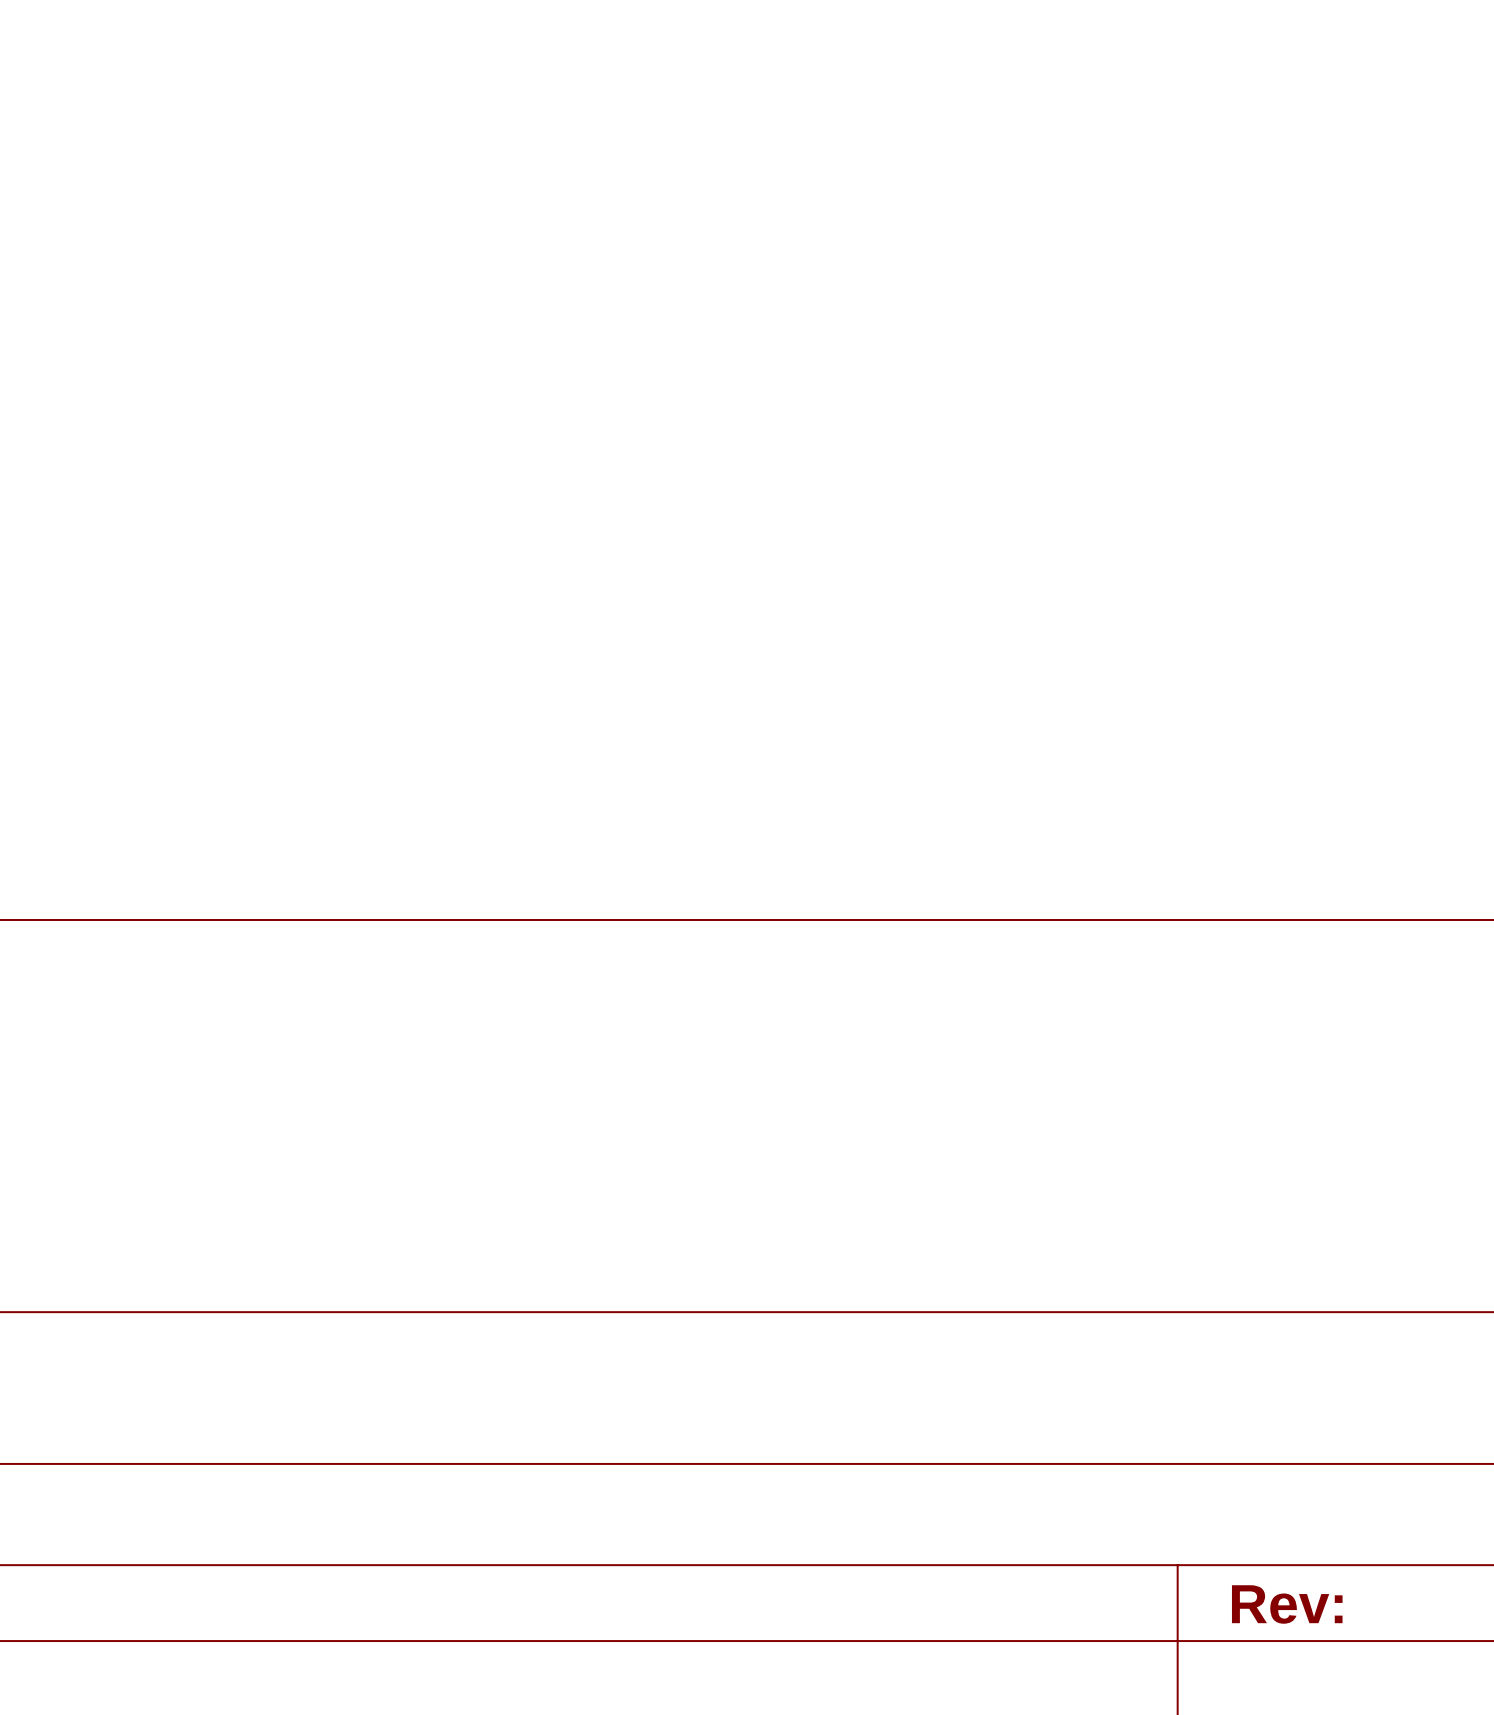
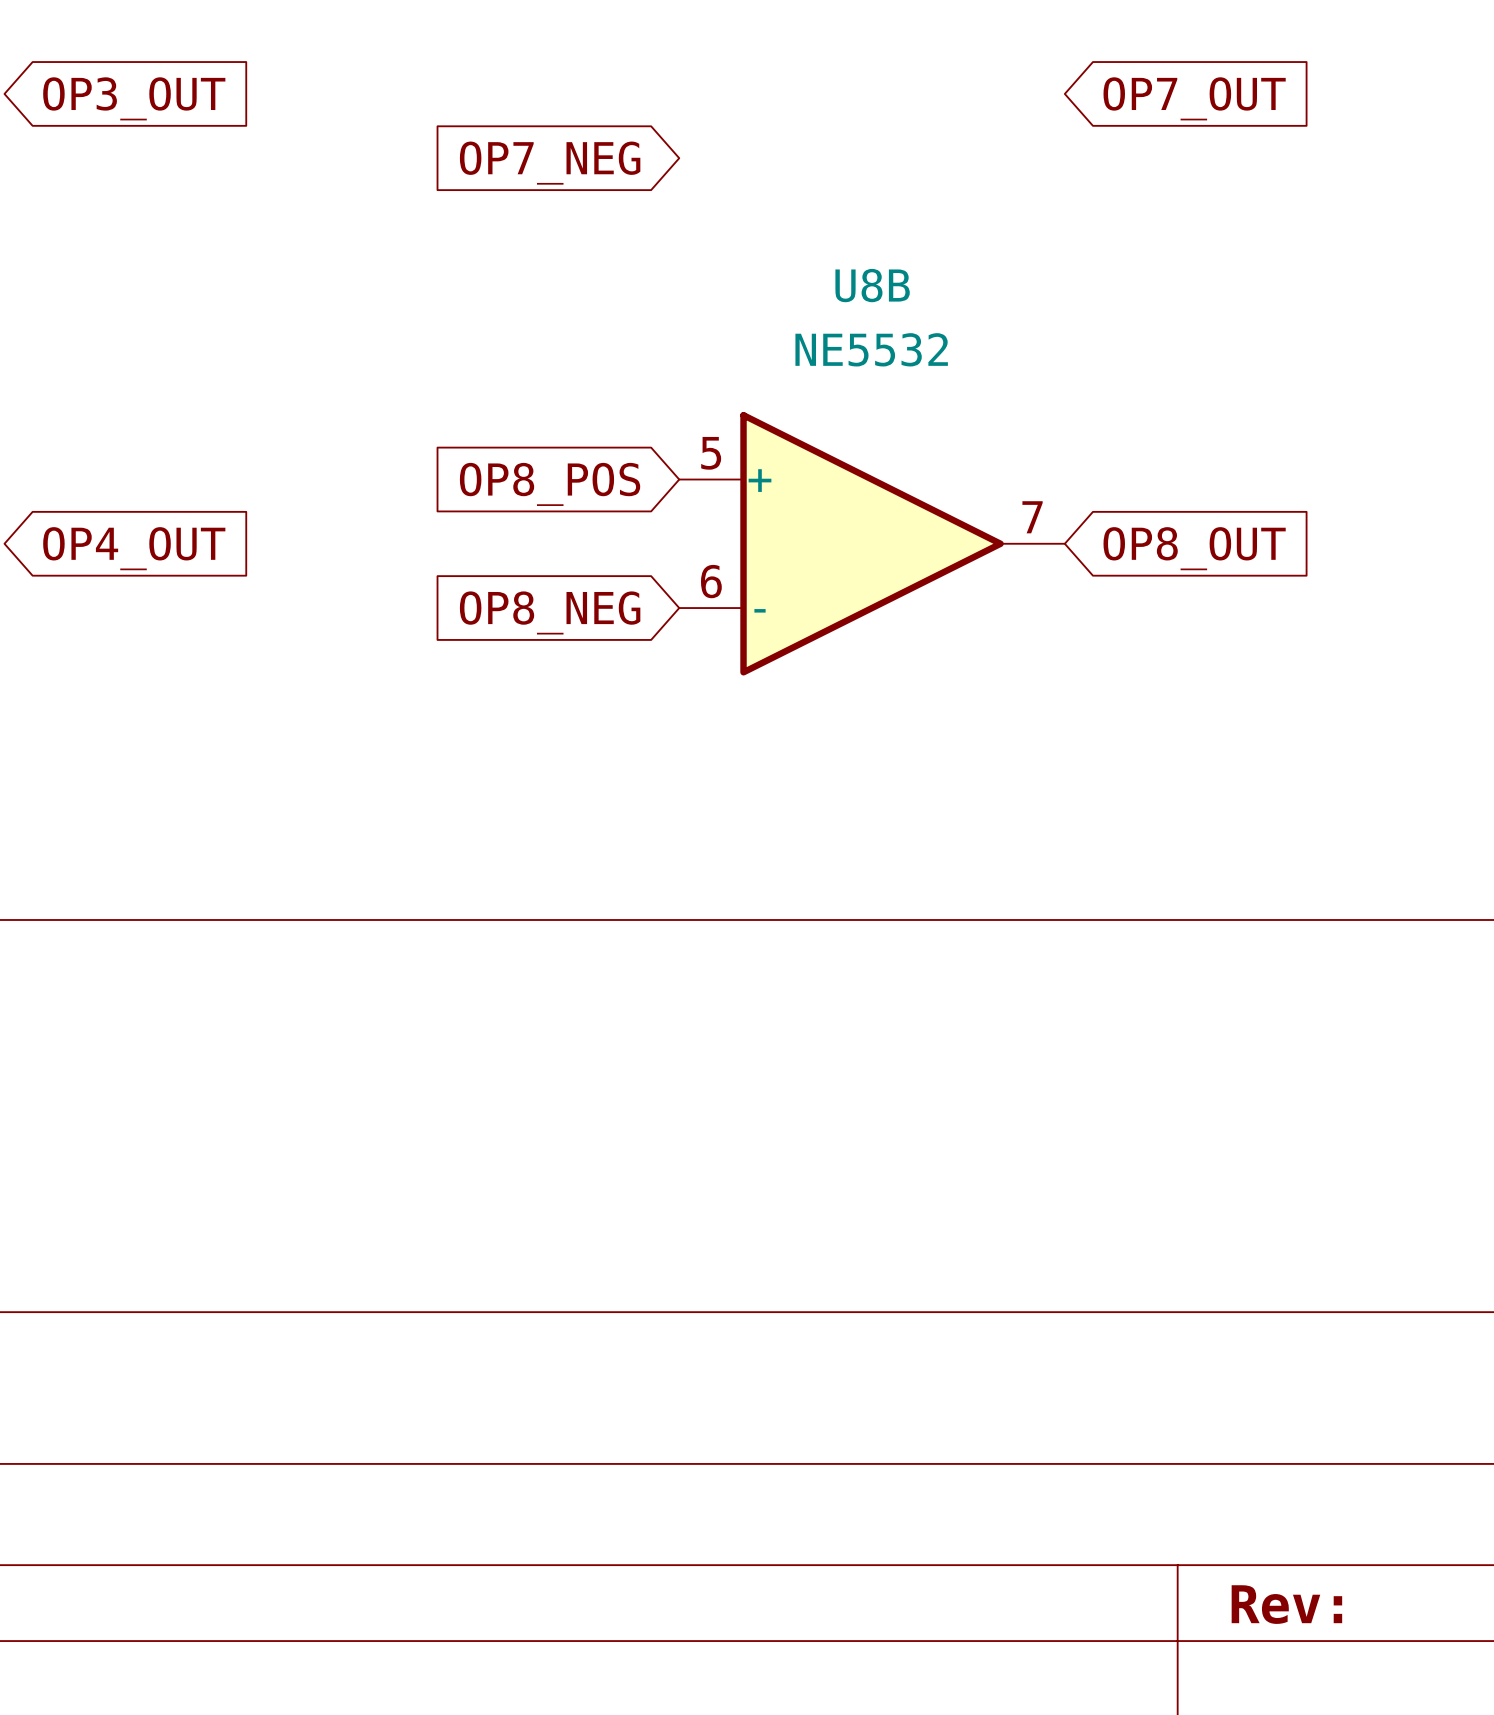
global label: none -> OP3_OUT (134, 98)
global label: none -> OP7_OUT (1194, 98)
global label: none -> OP7_NEG (550, 163)
global label: none -> OP8_POS (550, 484)
U8B: none -> NE5532 (872, 543)
global label: none -> OP4_OUT (134, 548)
global label: none -> OP8_OUT (1194, 548)
global label: none -> OP8_NEG (550, 612)

